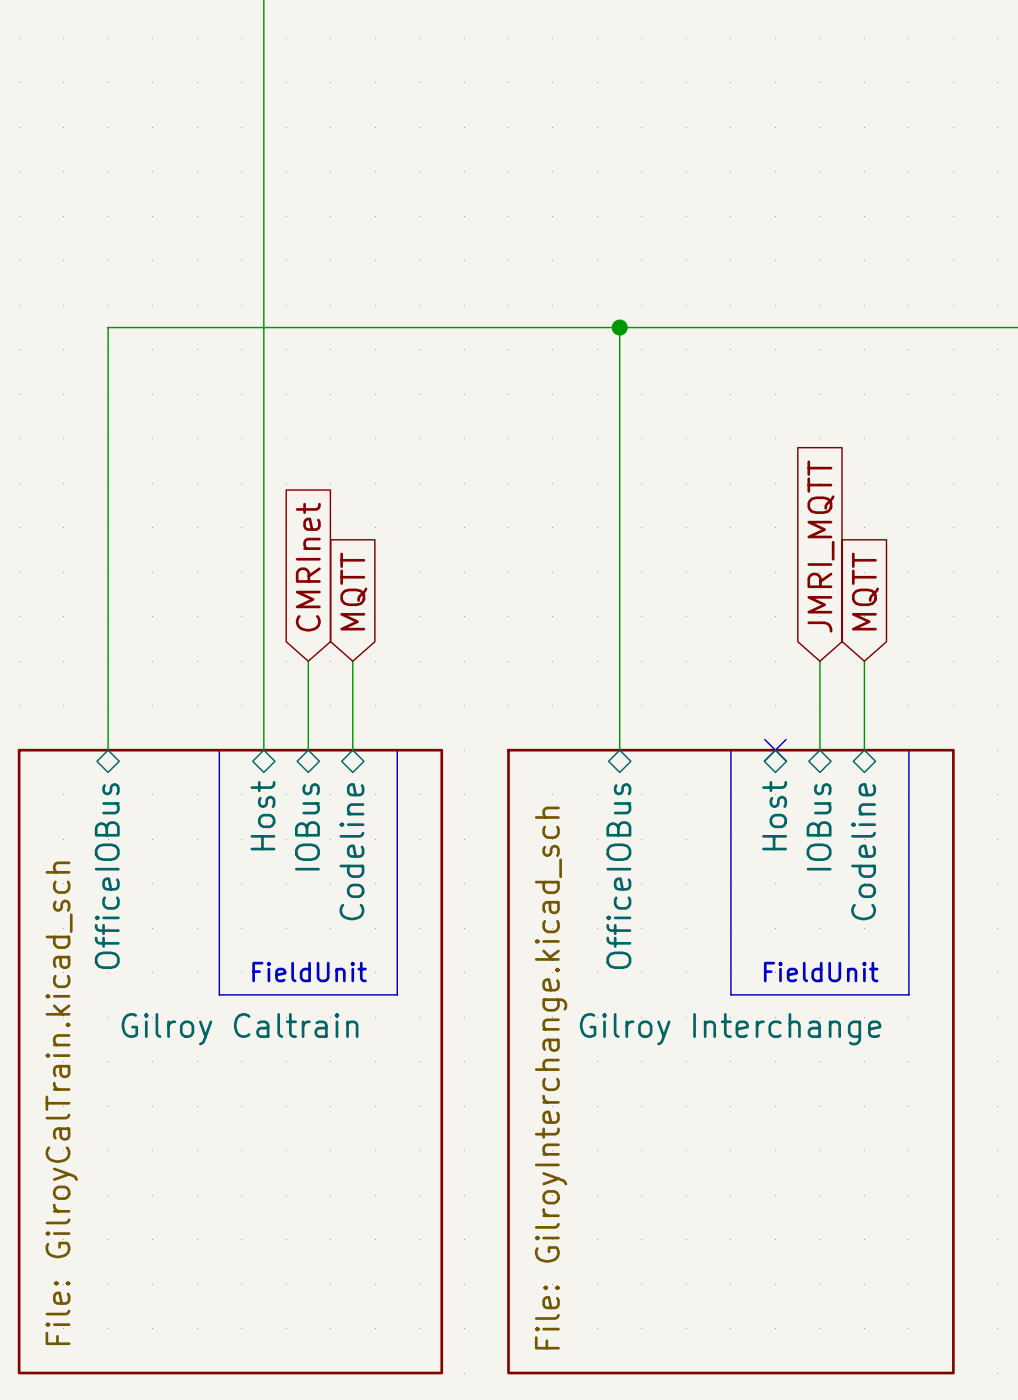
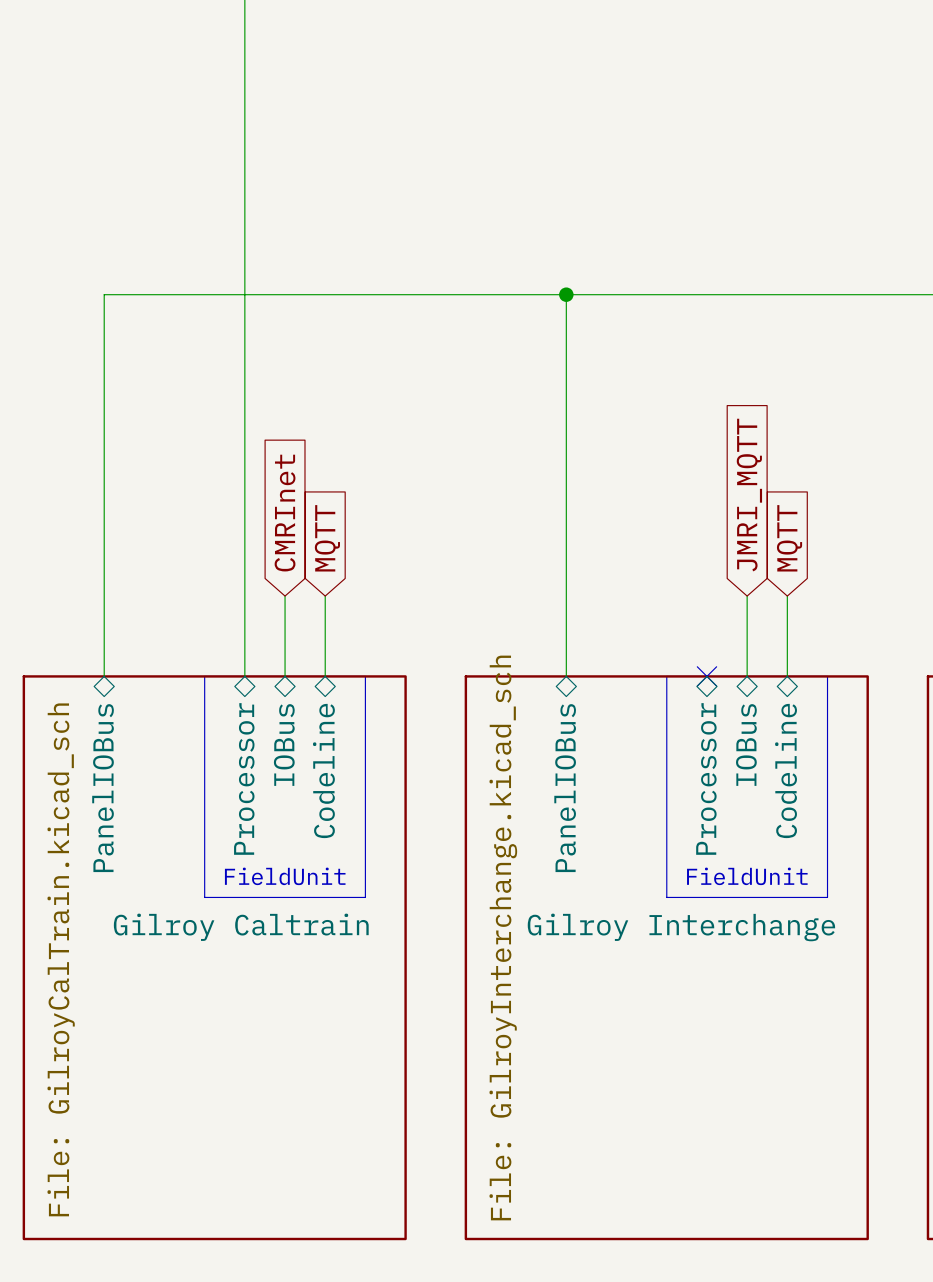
sheet pin: Host (262, 815) -> Processor (244, 778)
sheet pin: Host (774, 815) -> Processor (706, 778)
sheet pin: OfficeIOBus (107, 876) -> PanelIOBus (103, 788)
sheet pin: OfficeIOBus (618, 876) -> PanelIOBus (565, 788)

